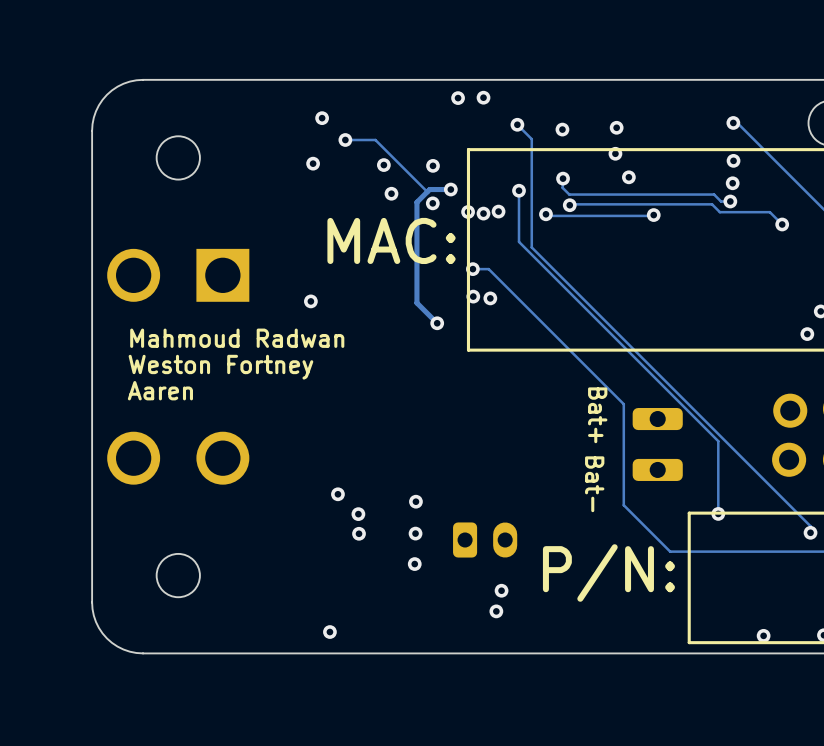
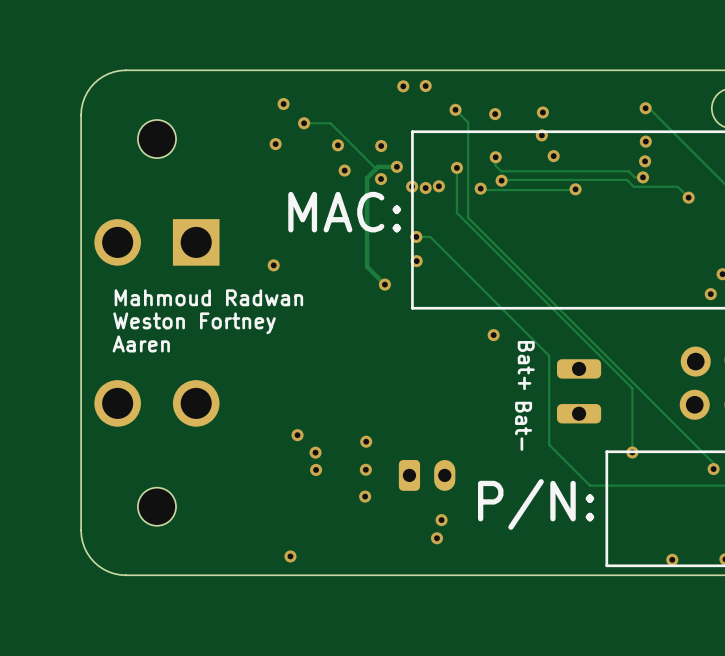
via position: (490, 298) -> (493, 335)

